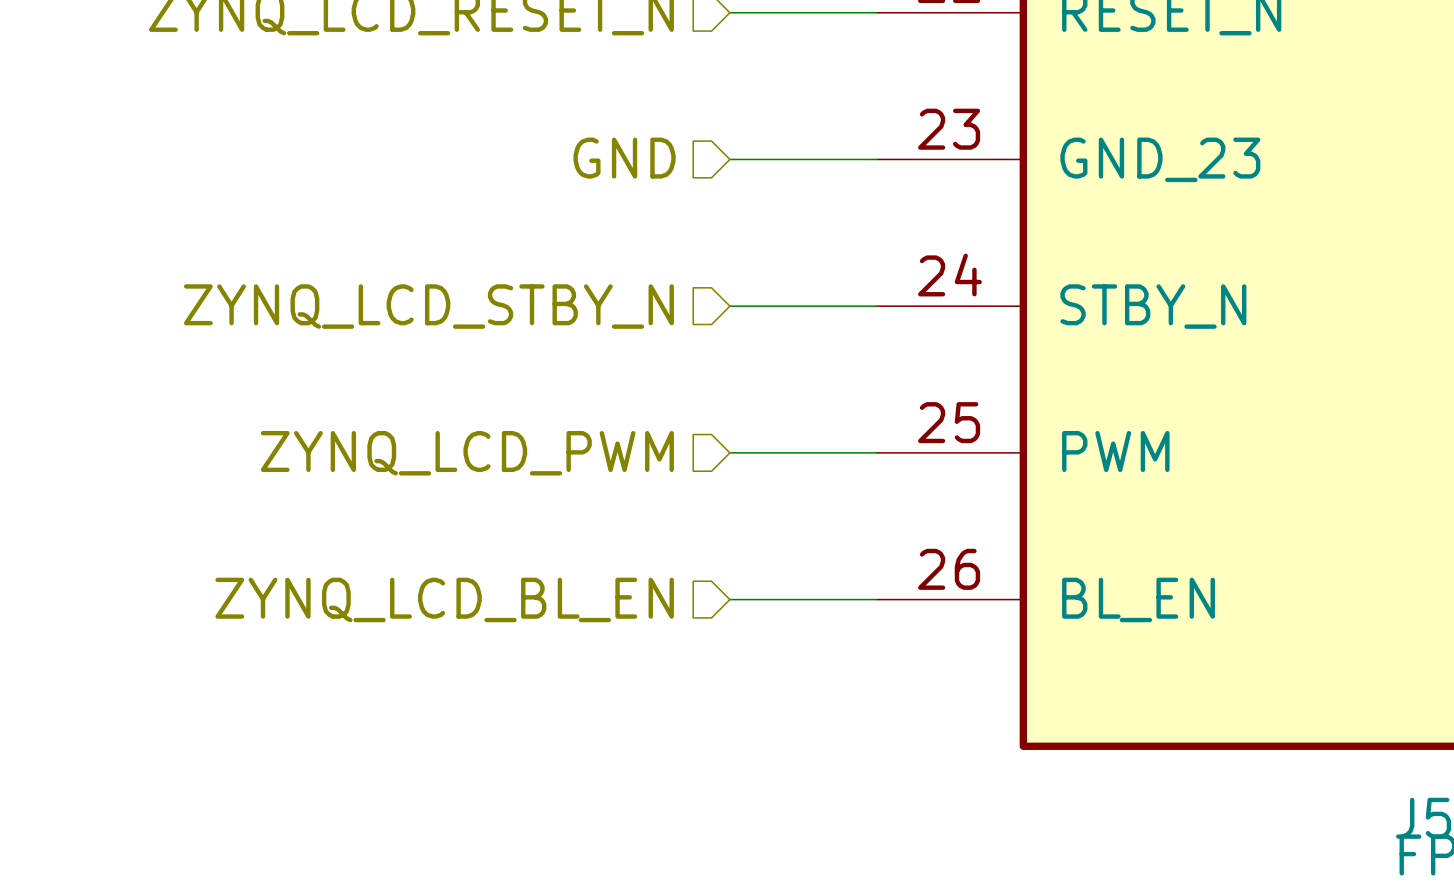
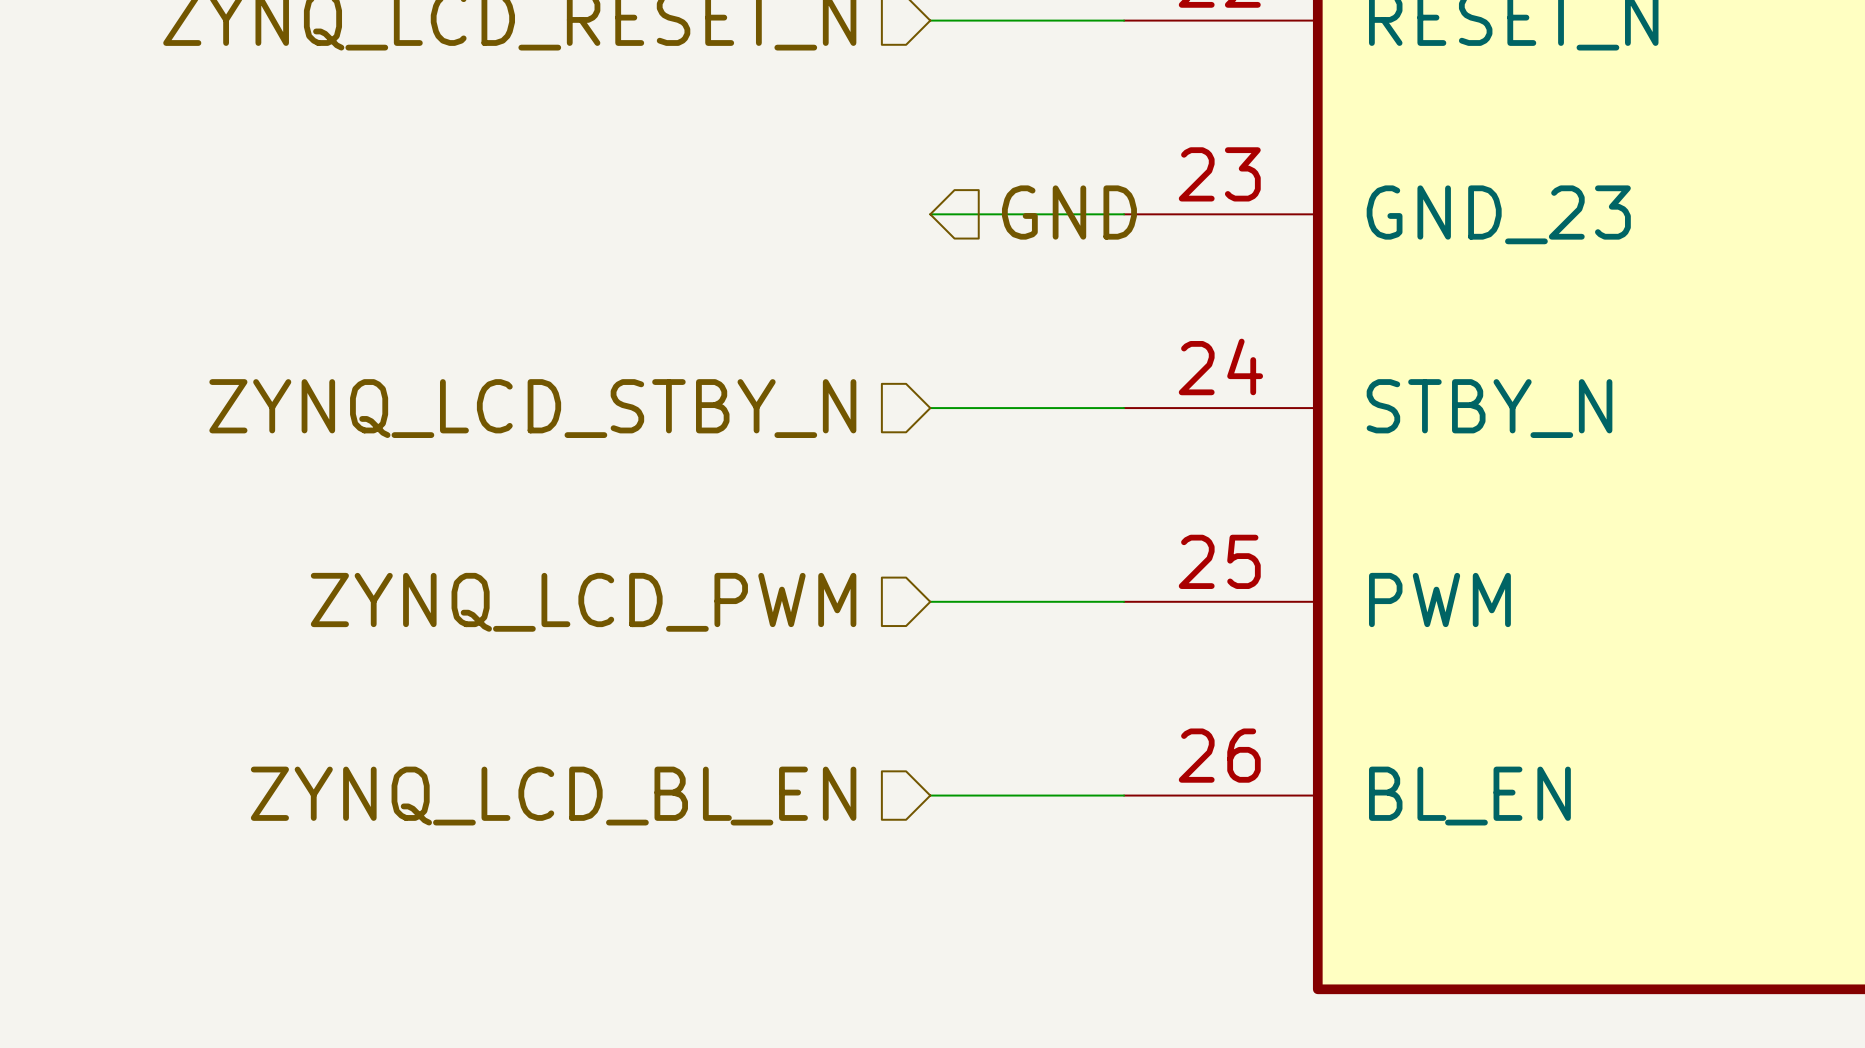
hierarchical label rotation: 0° (624, 158) -> 180° (1069, 212)
hierarchical label position: GND (624, 158) -> GND (1069, 212)

